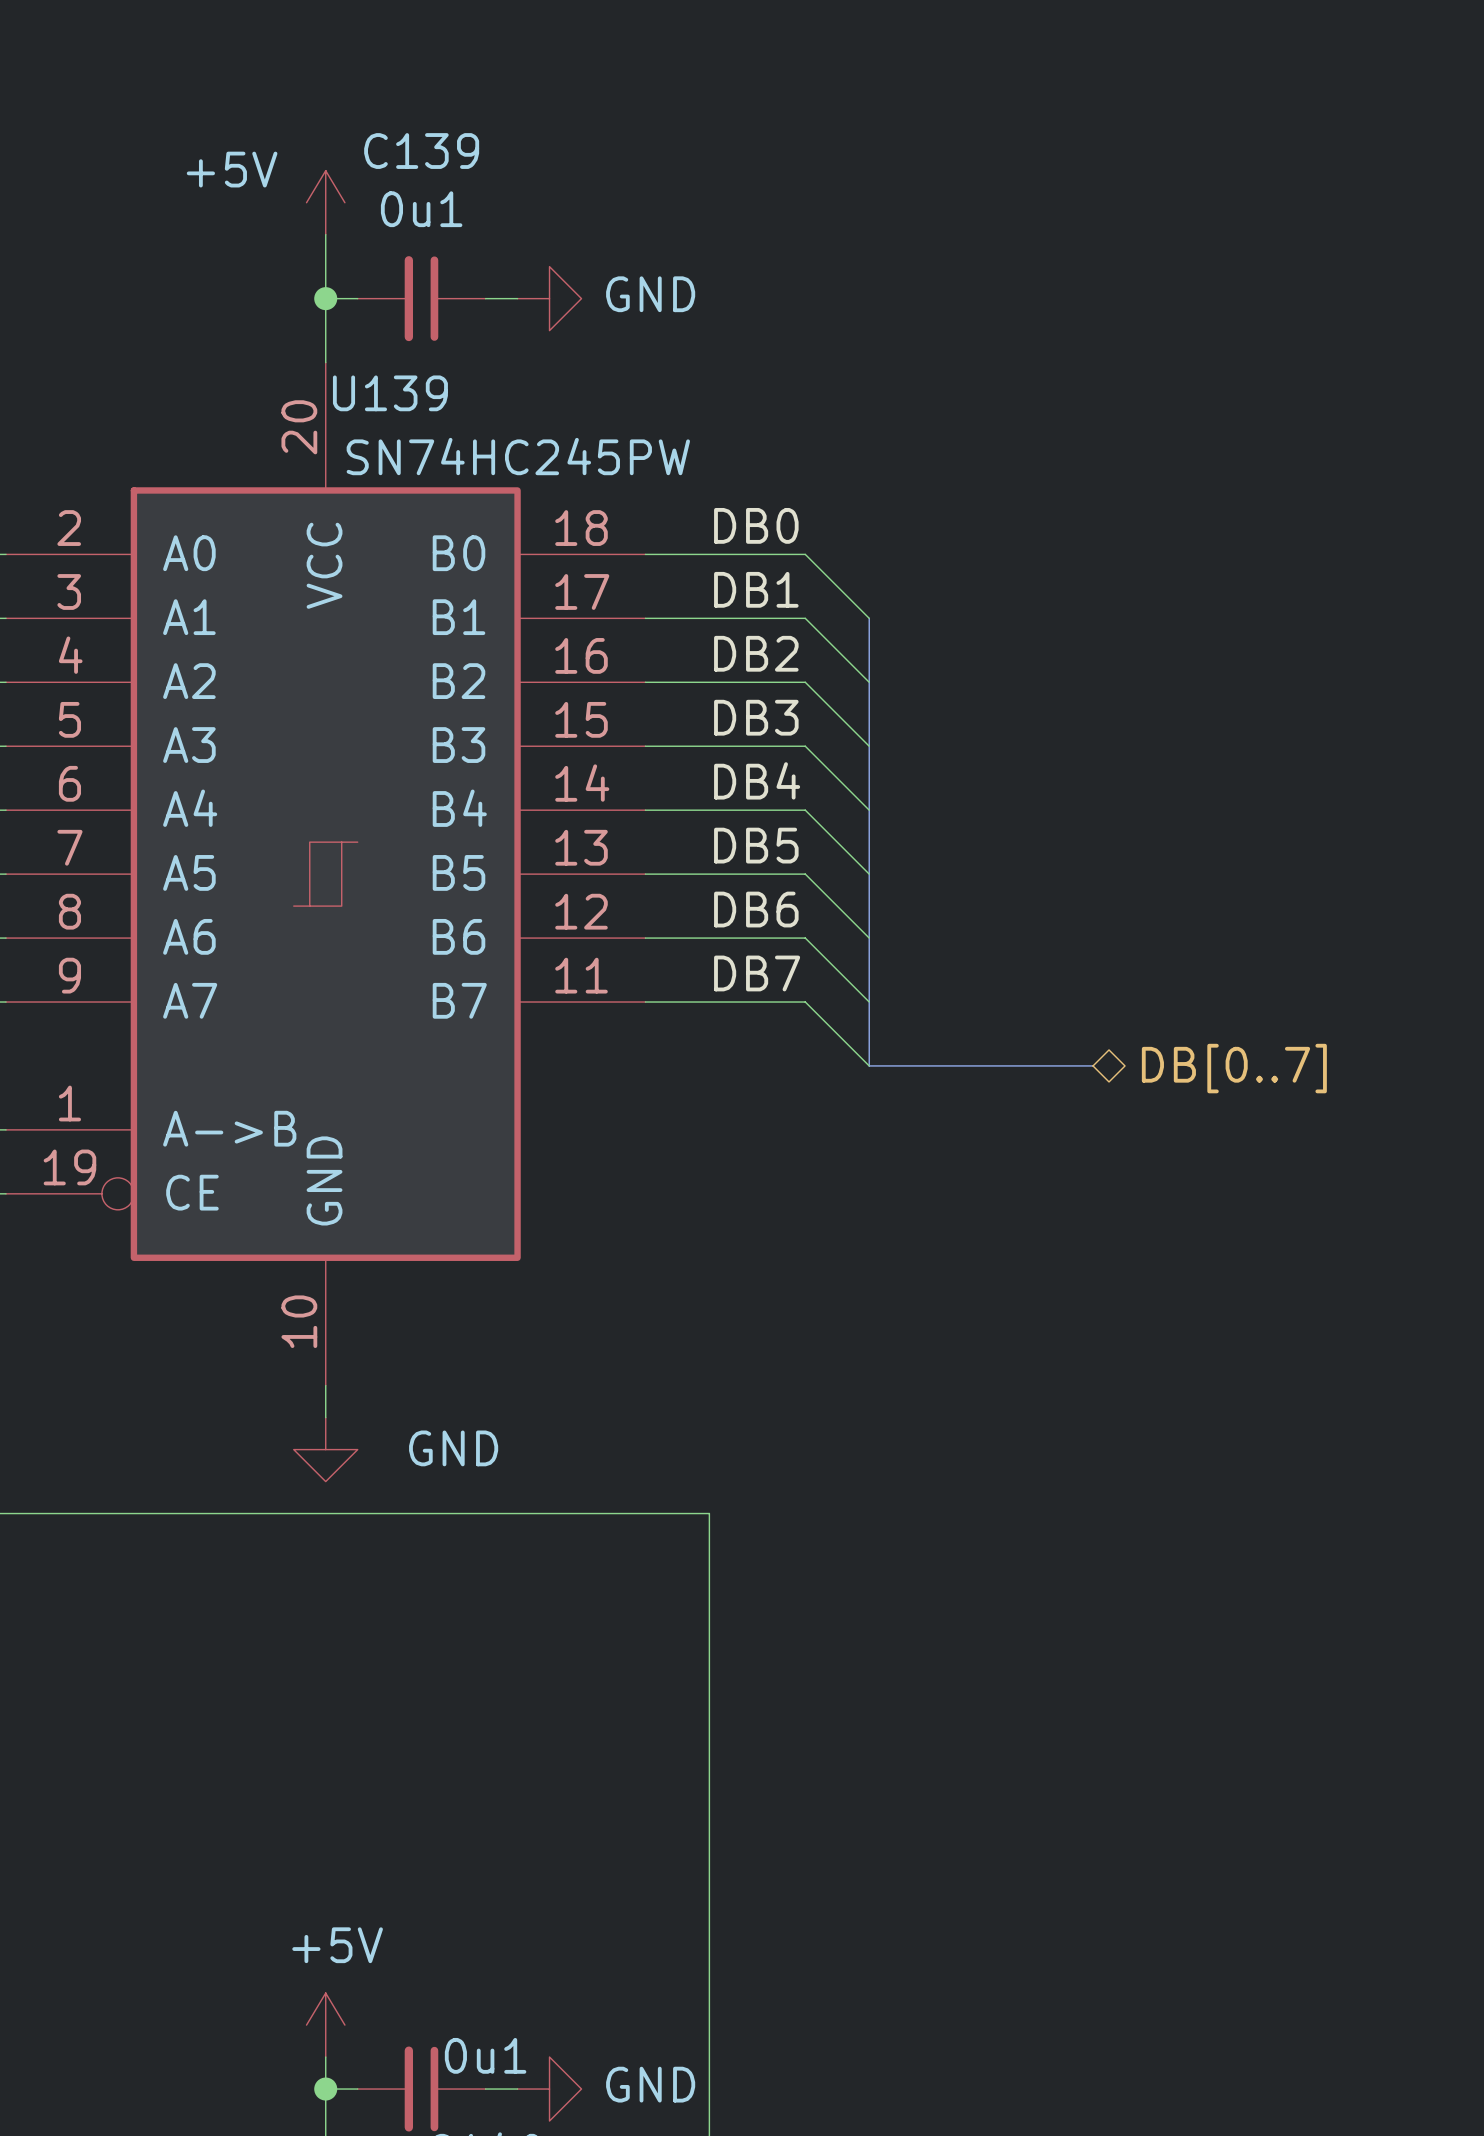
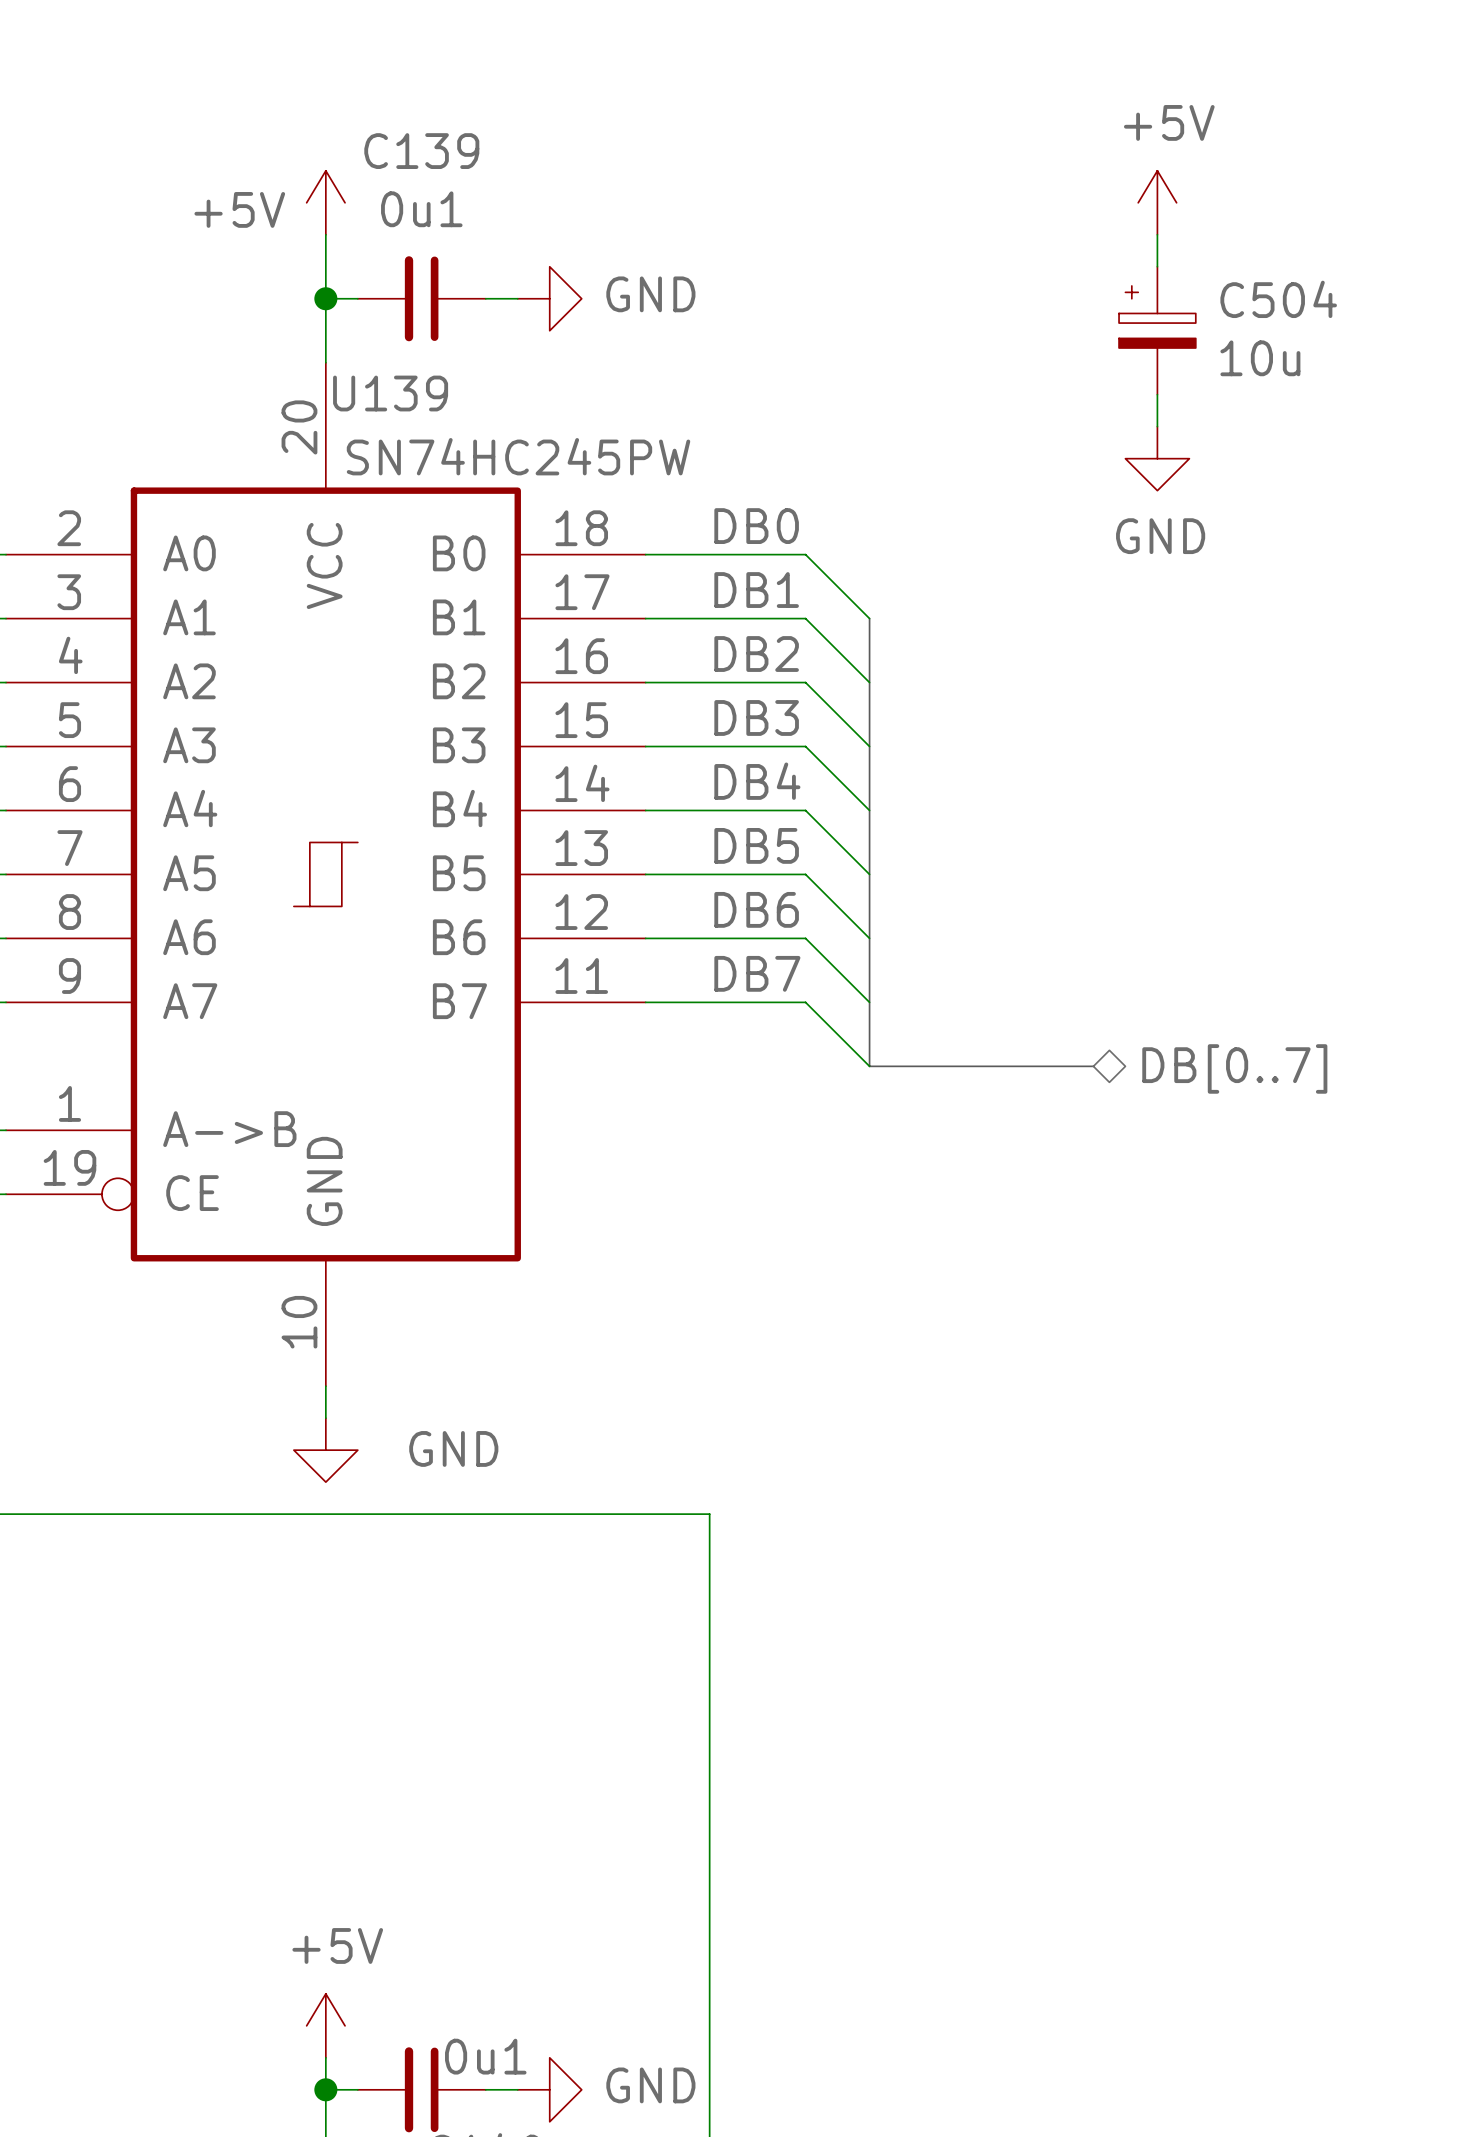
power symbol text position: +5V (232, 169) -> +5V (239, 209)
power symbol: none -> +5V (1157, 202)
wire: none -> (1157, 234) (1157, 266)
C504: none -> 10u (1157, 330)
wire: none -> (1157, 394) (1157, 426)
power symbol: none -> GND (1157, 458)

